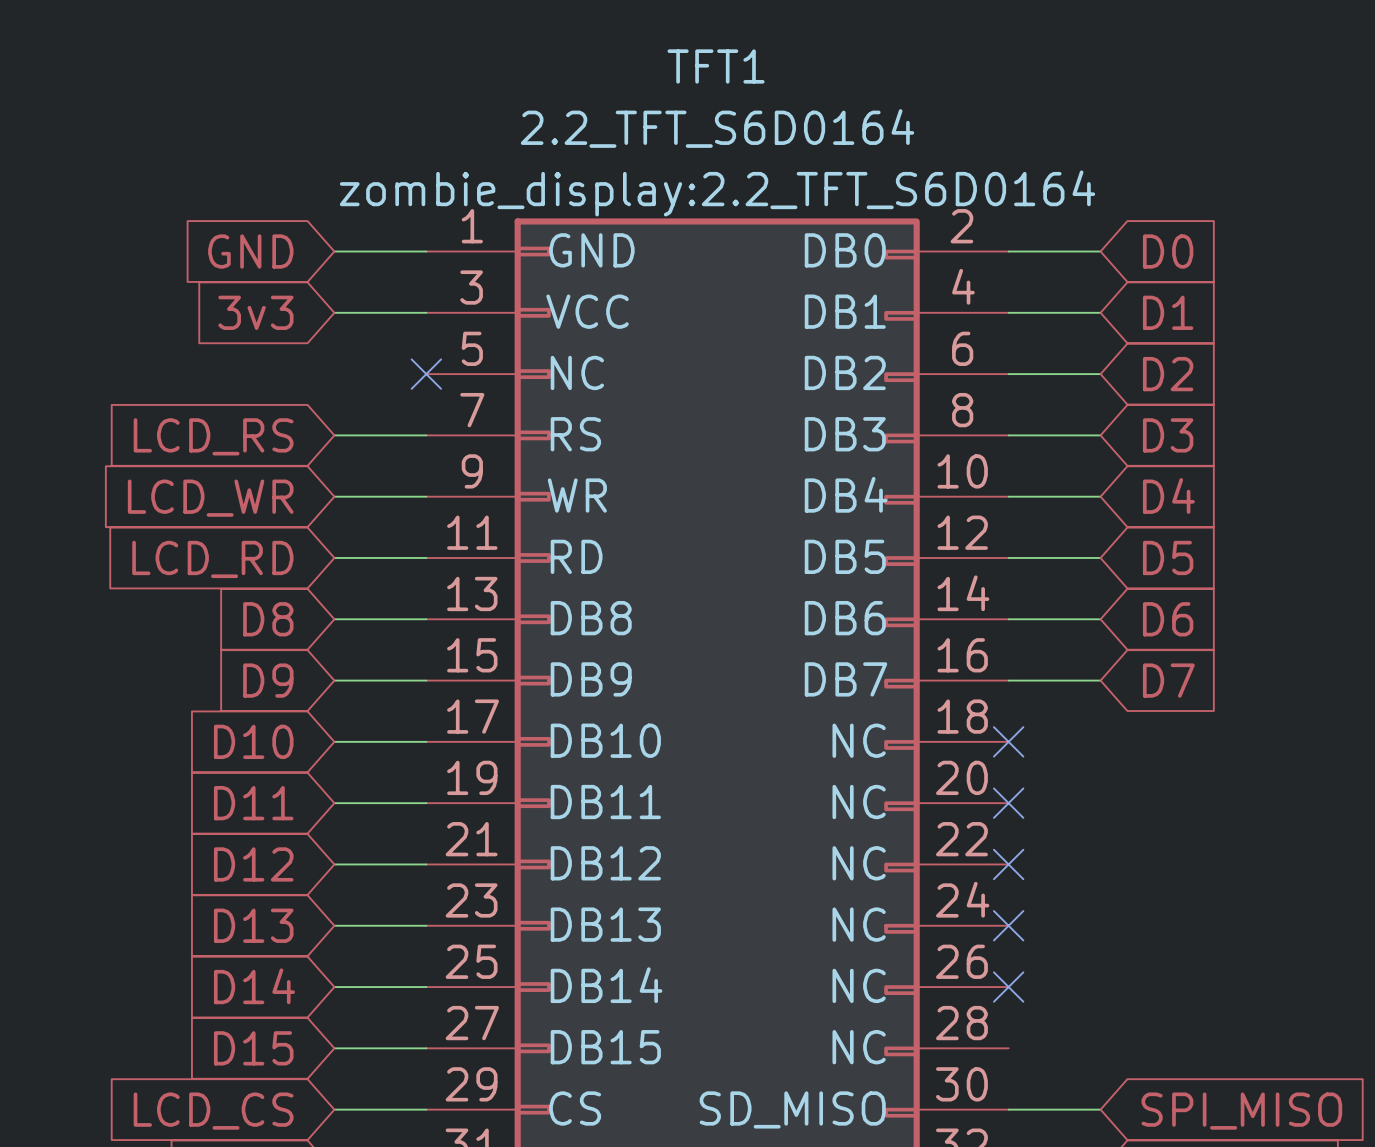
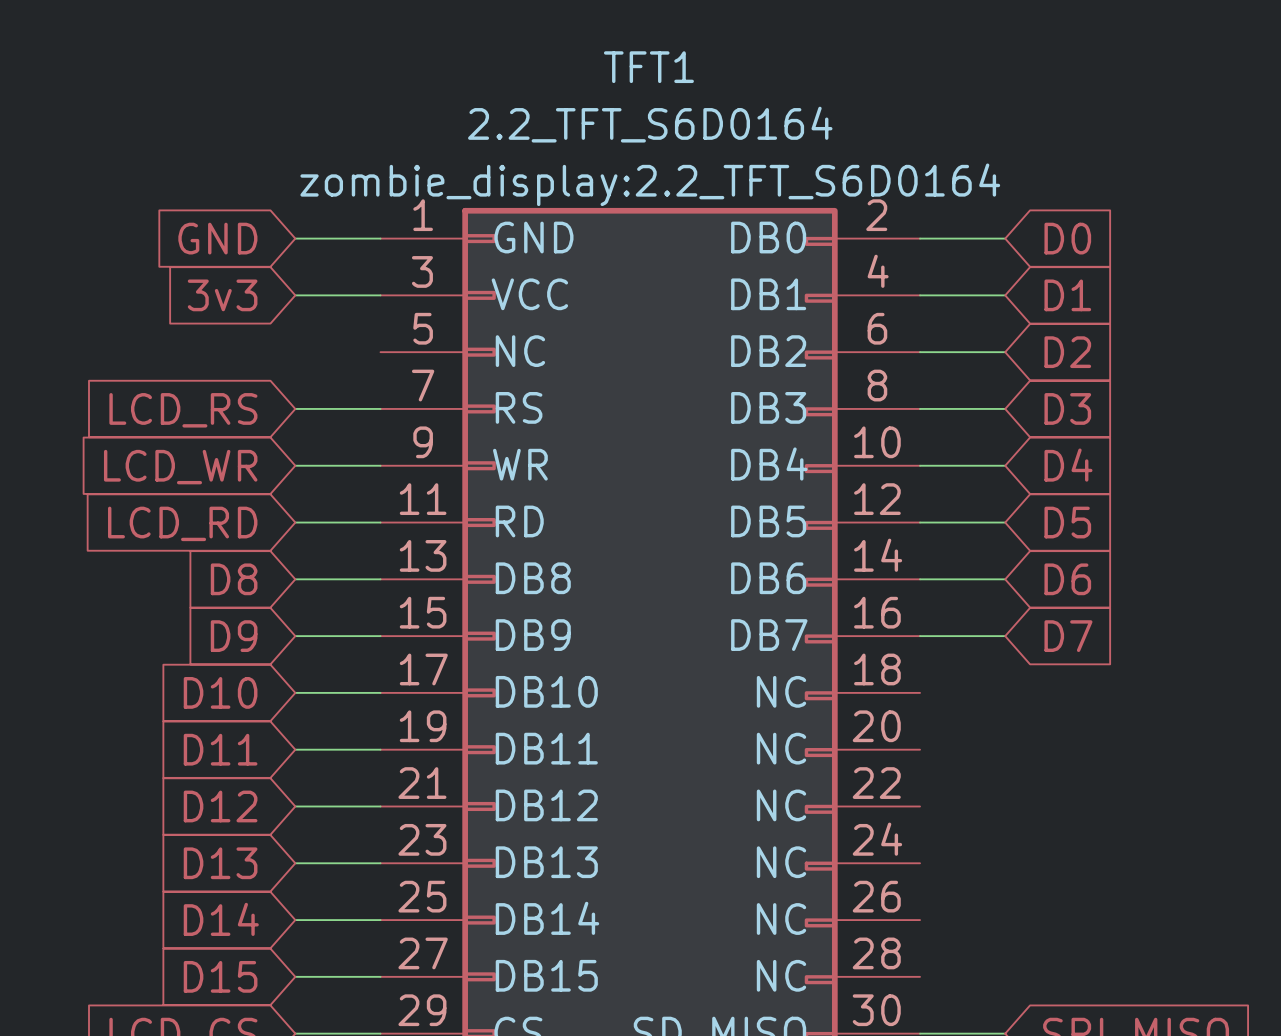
no-connect mark: (426, 374) -> none
no-connect mark: (1008, 741) -> none
no-connect mark: (1008, 803) -> none
no-connect mark: (1008, 864) -> none
no-connect mark: (1008, 925) -> none
no-connect mark: (1008, 987) -> none

